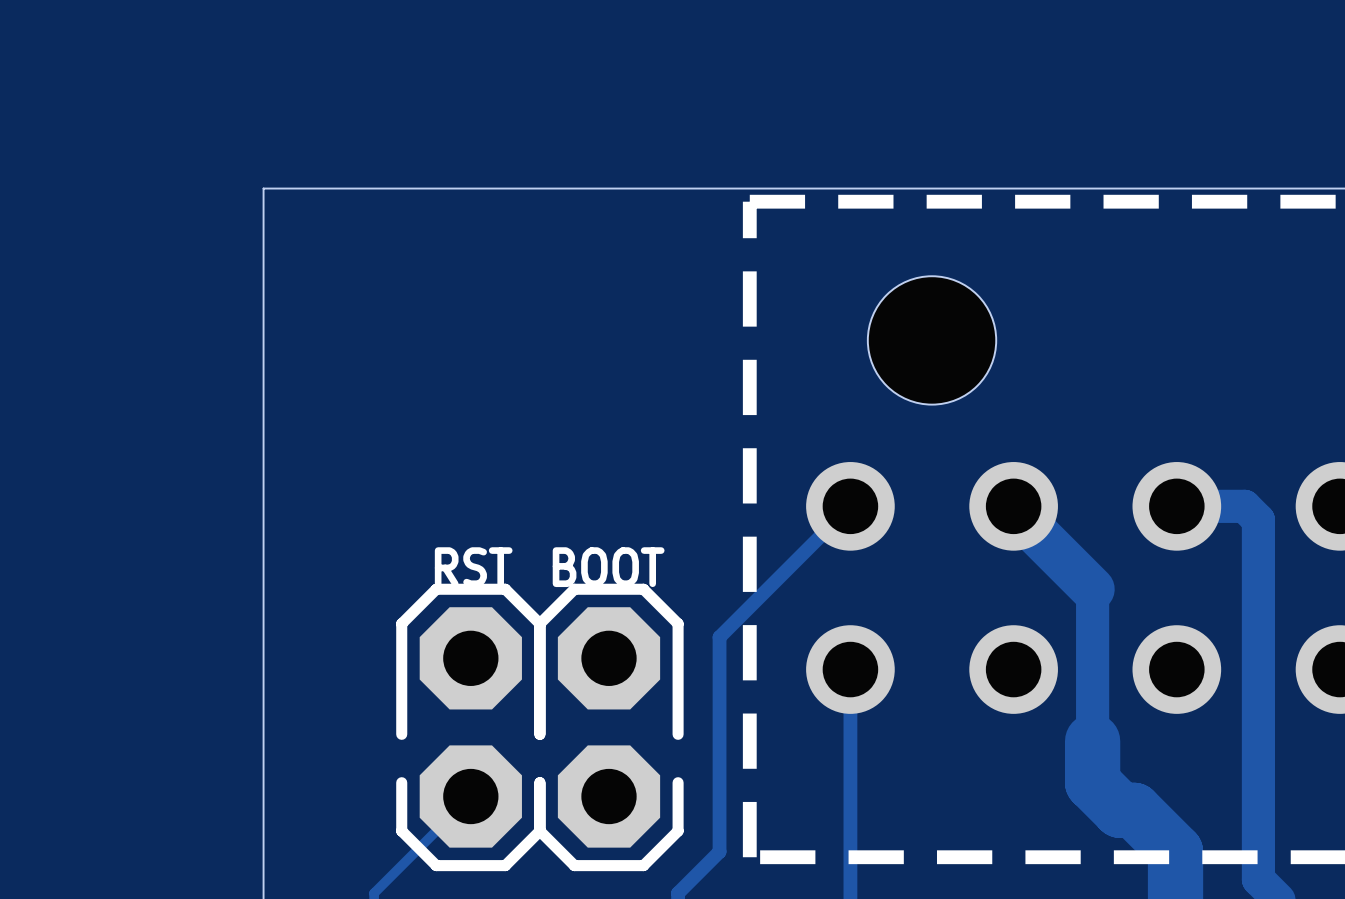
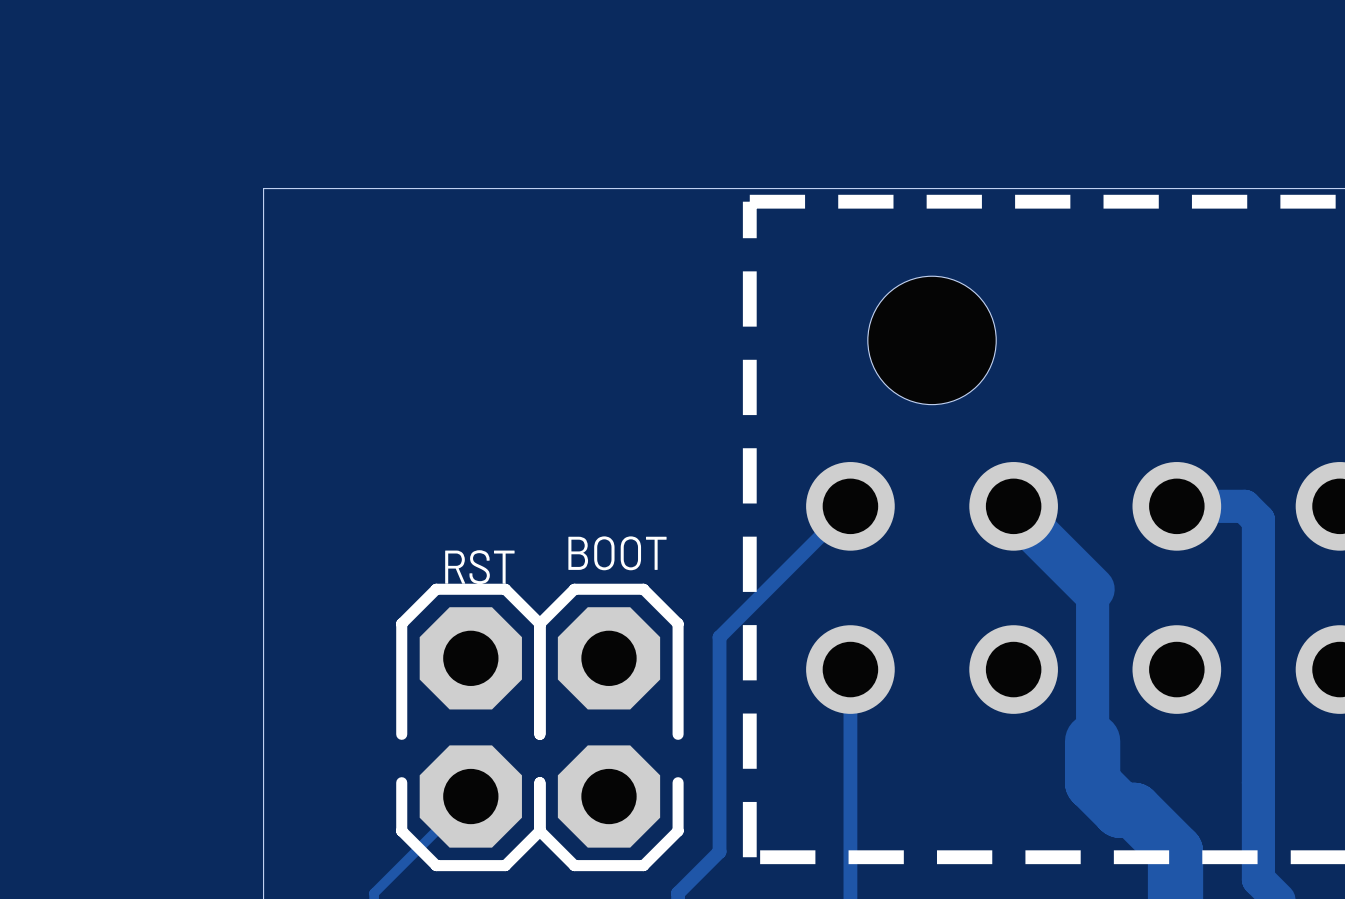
BOOT name position: BOOT (608, 567) -> BOOT (617, 553)

